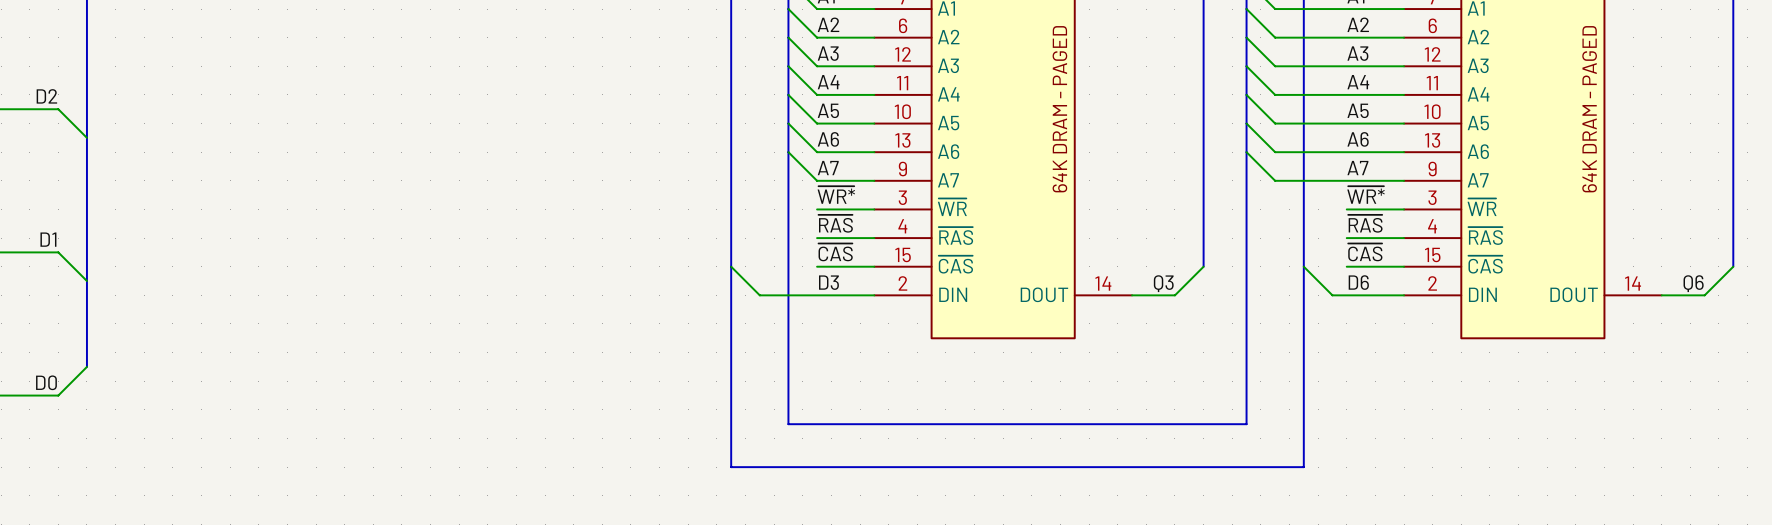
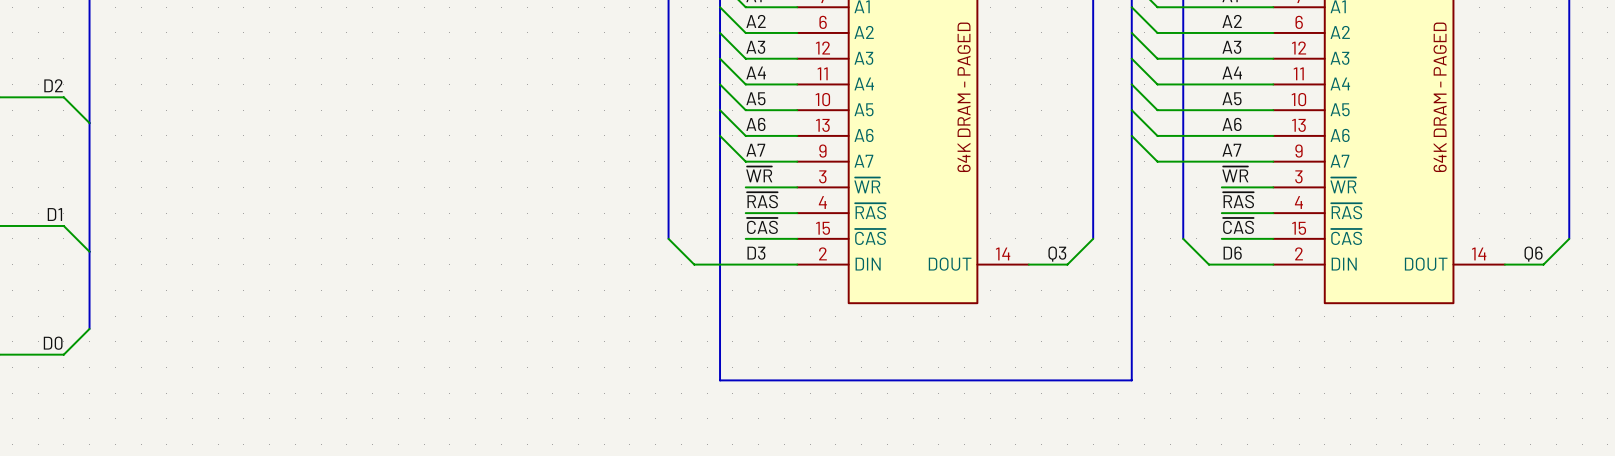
label: ~{WR*} (836, 195) -> ~{WR} (759, 174)
label: ~{WR*} (1366, 195) -> ~{WR} (1235, 174)
bus: (731, 266) (731, 467) (1303, 467) (1303, 266) -> none

